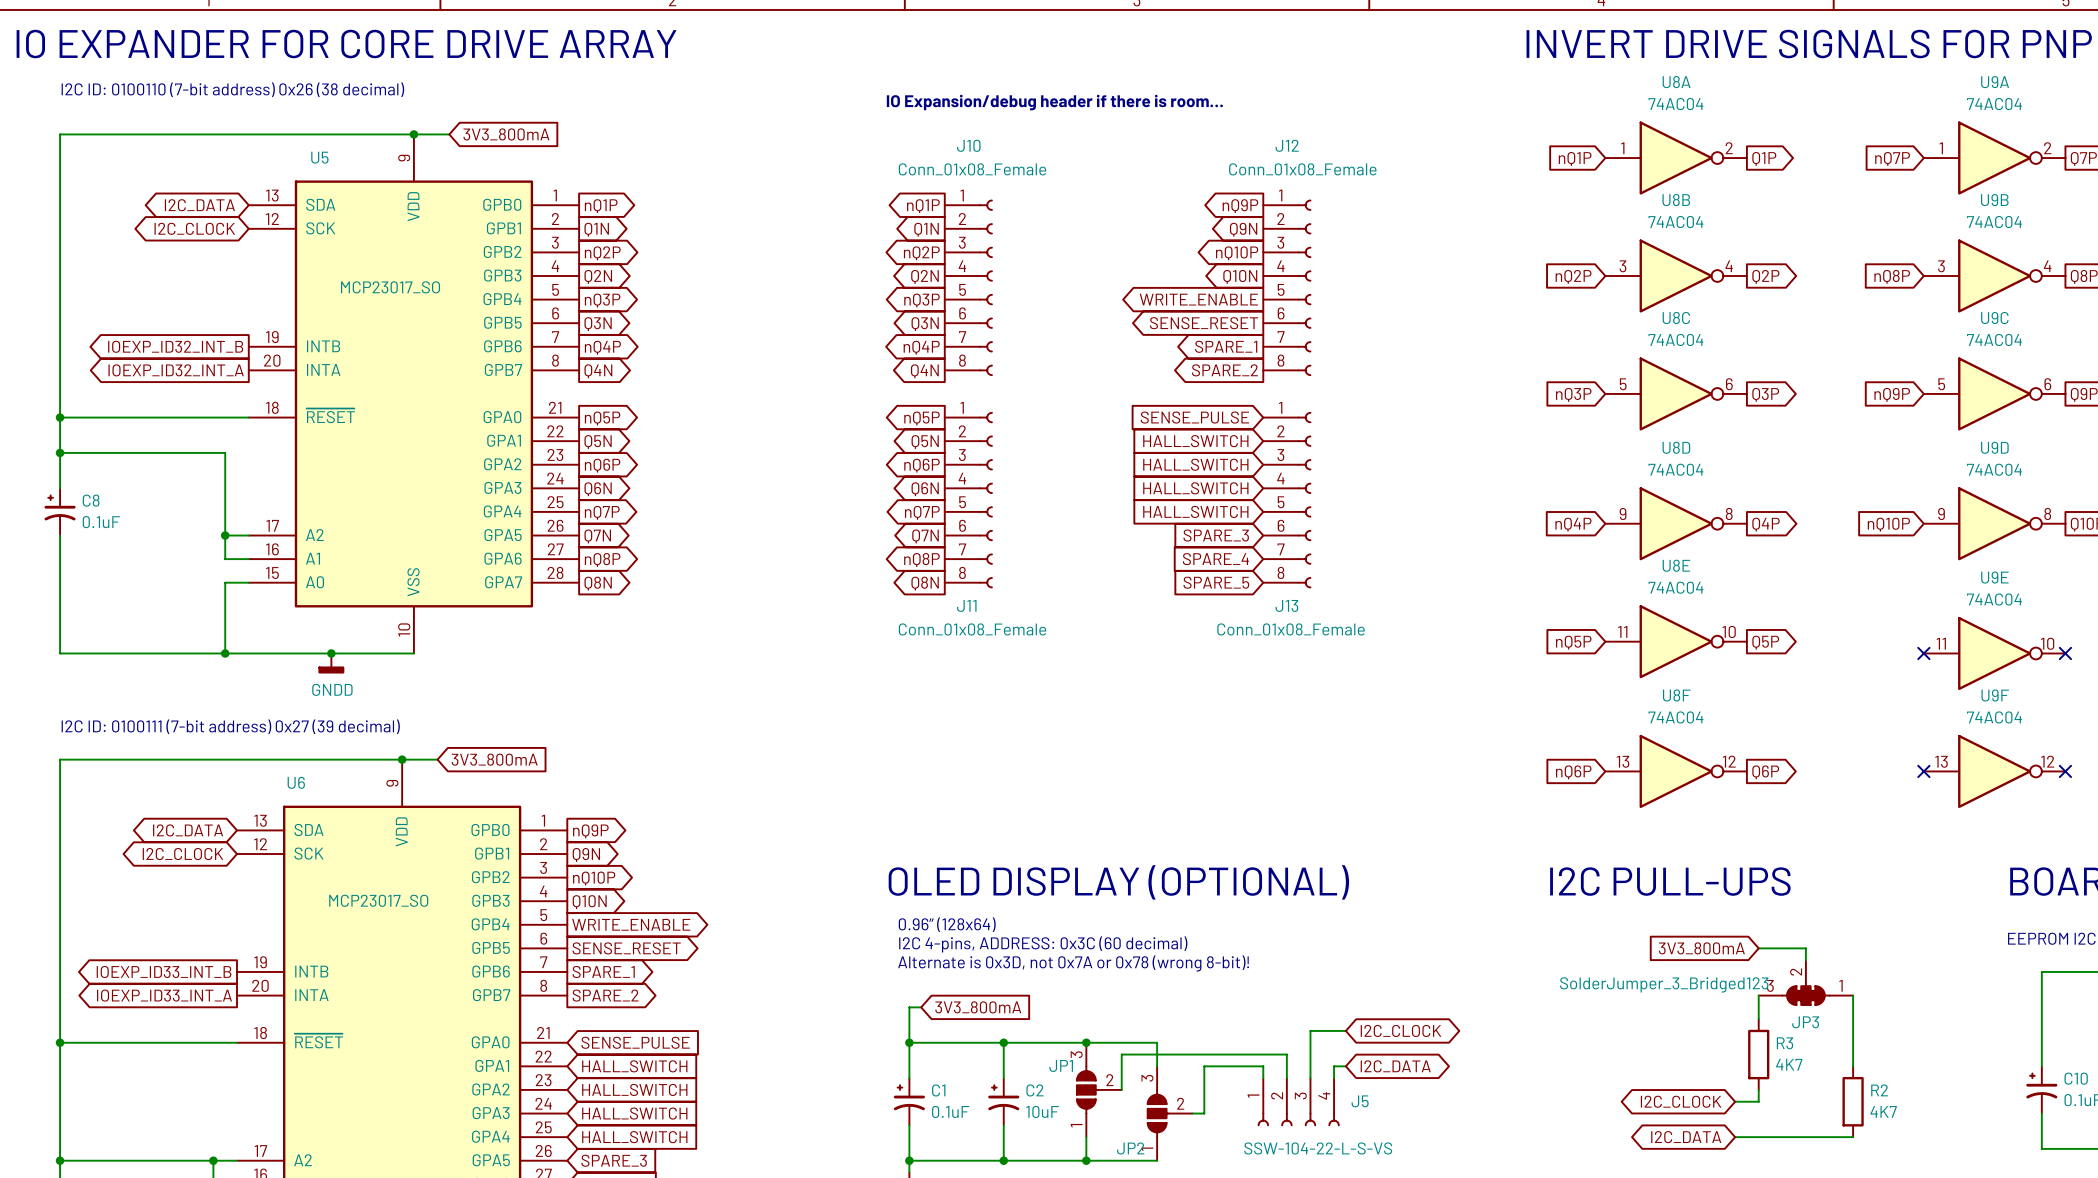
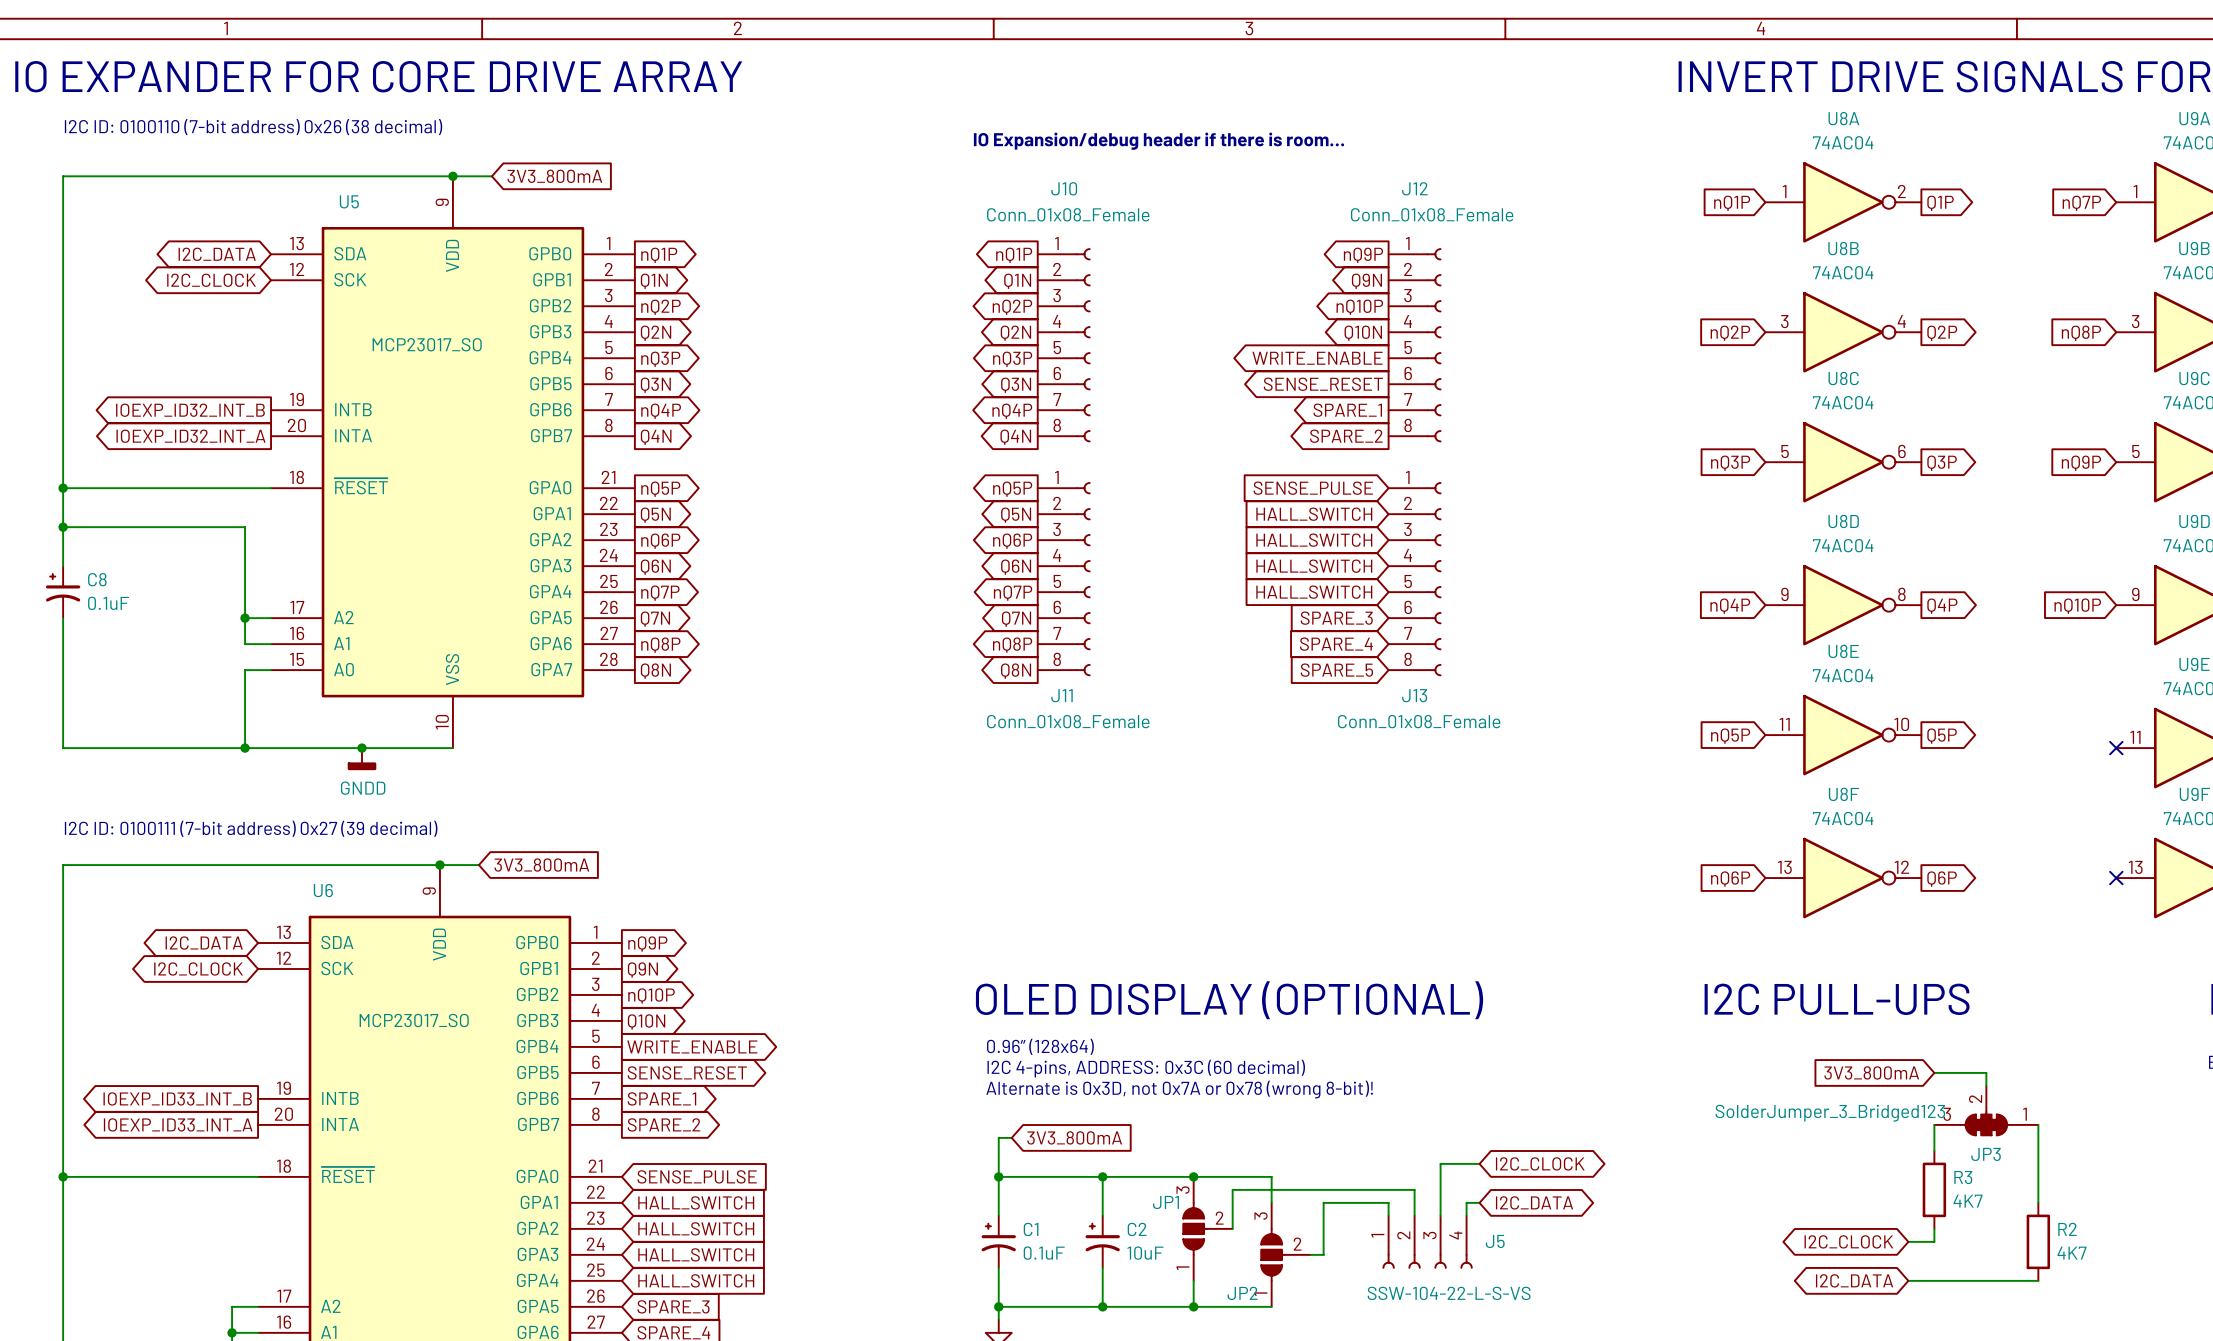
wire: (60, 1160) (213, 1160) -> none
junction: (60, 1160) -> none
junction: (213, 1160) -> none

